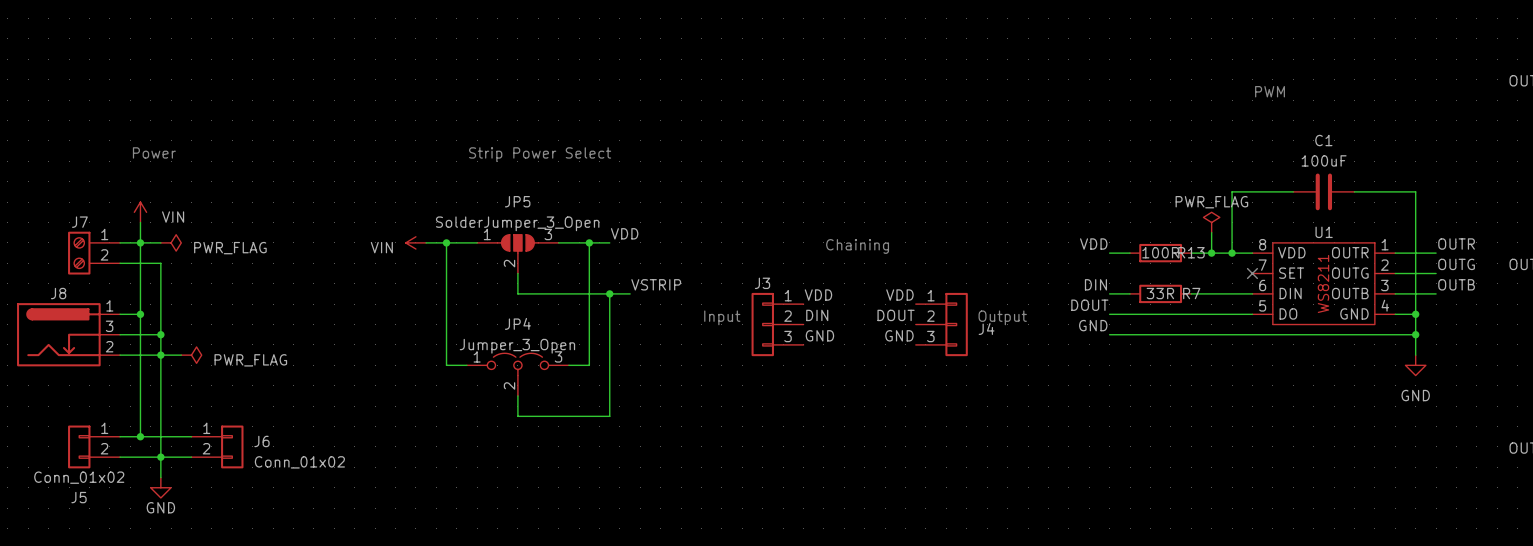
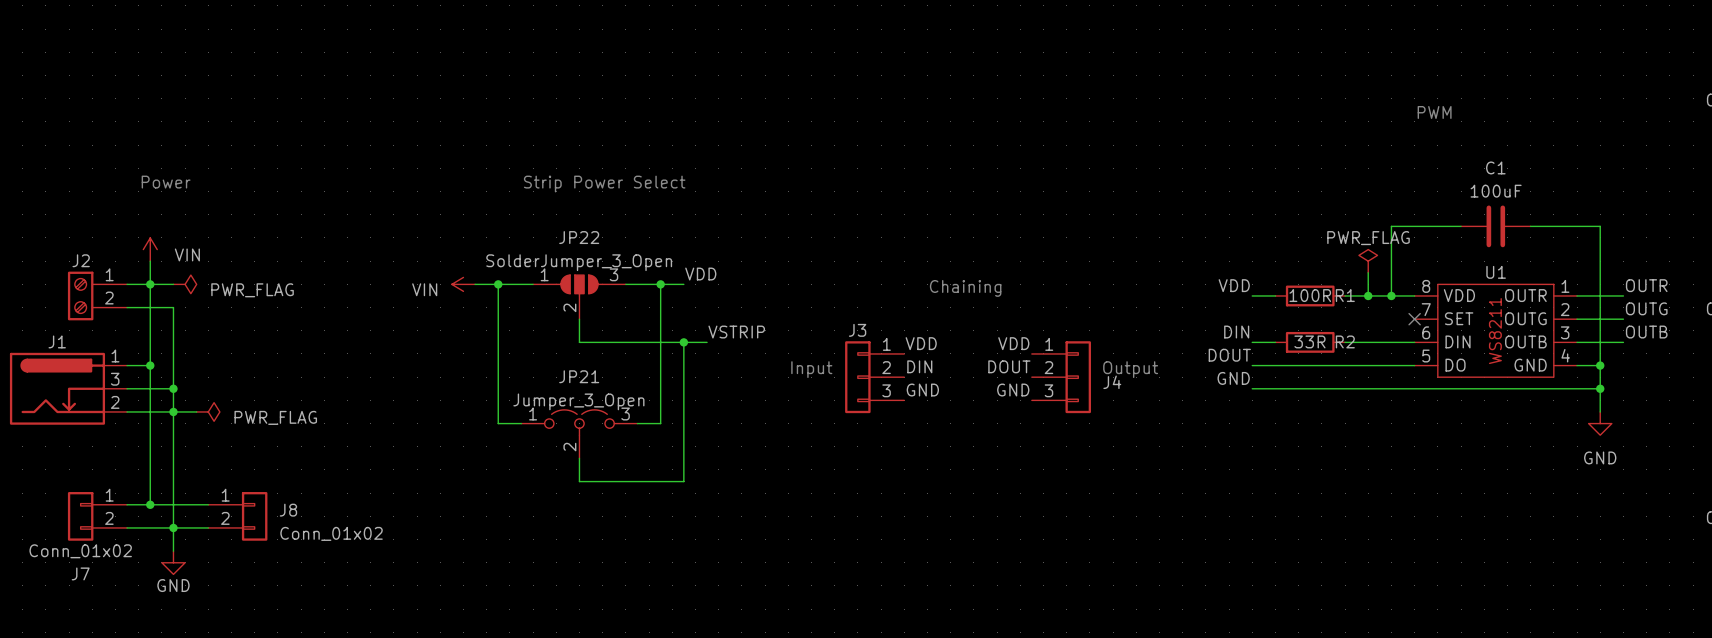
JP5 name: JP5 (517, 201) -> JP22 (579, 237)
J7 name: J7 (79, 222) -> J2 (81, 260)
R13 name: R13 (1191, 252) -> R1 (1345, 295)
J8 name: J8 (58, 293) -> J1 (57, 341)
R7 name: R7 (1191, 293) -> R2 (1345, 341)
JP4 name: JP4 (517, 323) -> JP21 (579, 376)
J6 name: J6 (261, 441) -> J8 (288, 510)
J5 name: J5 (79, 497) -> J7 (80, 573)

